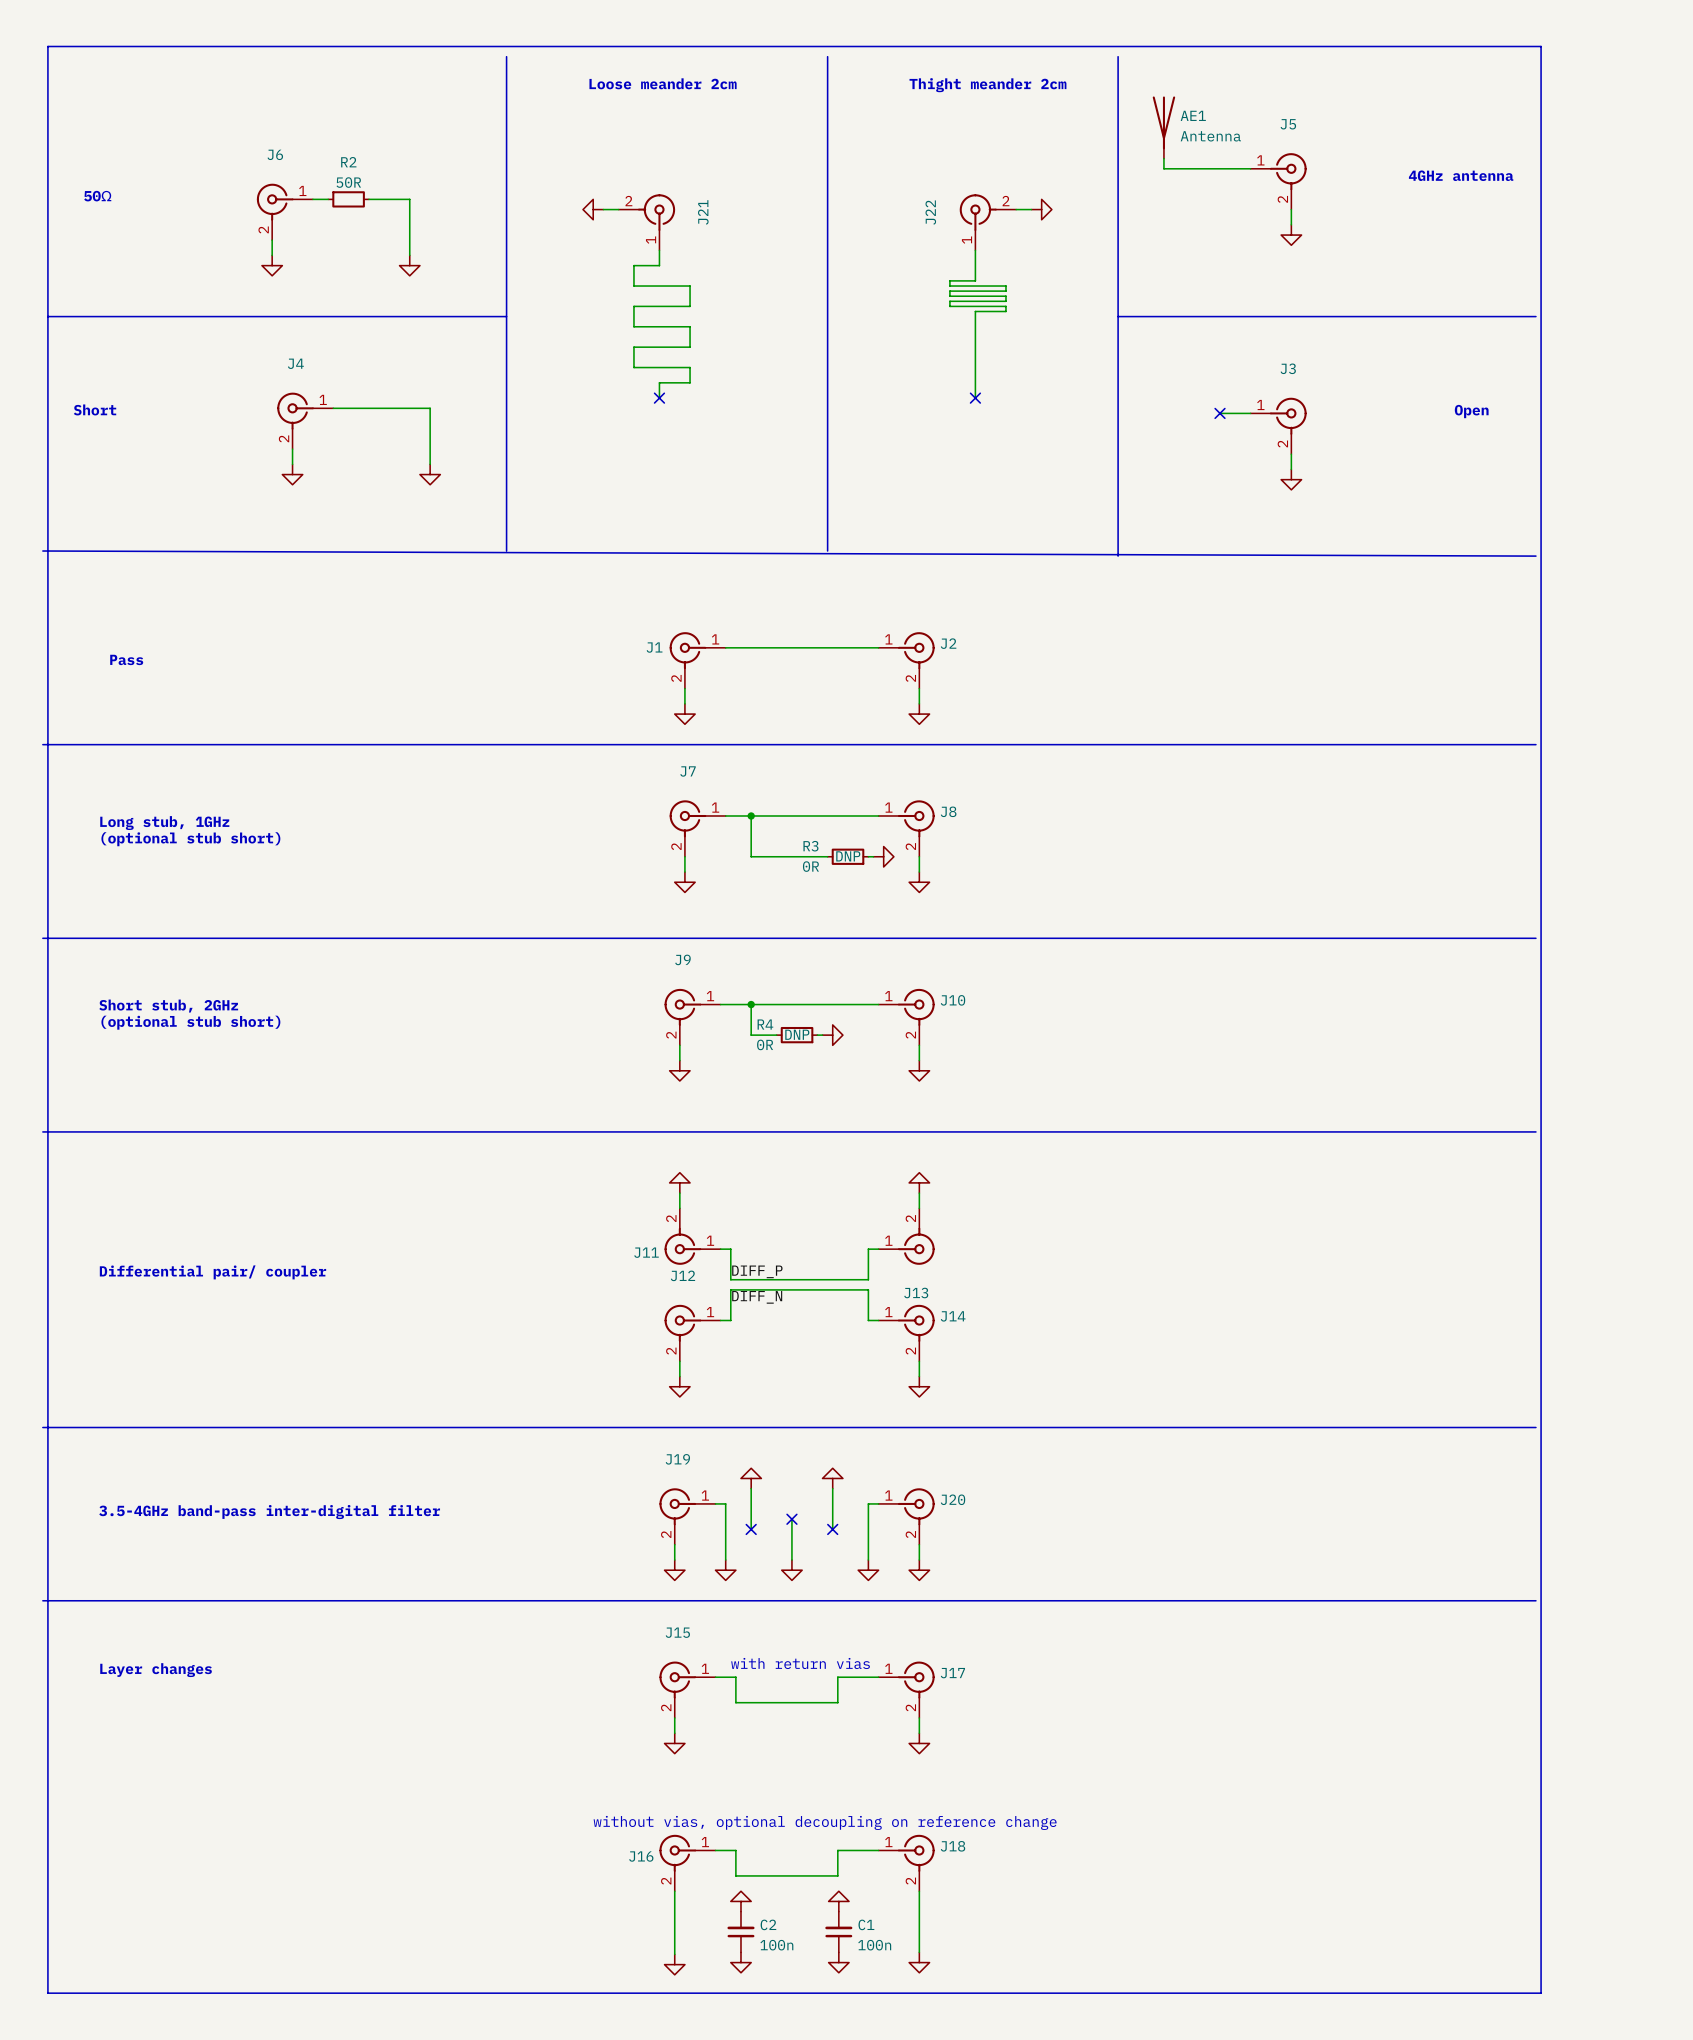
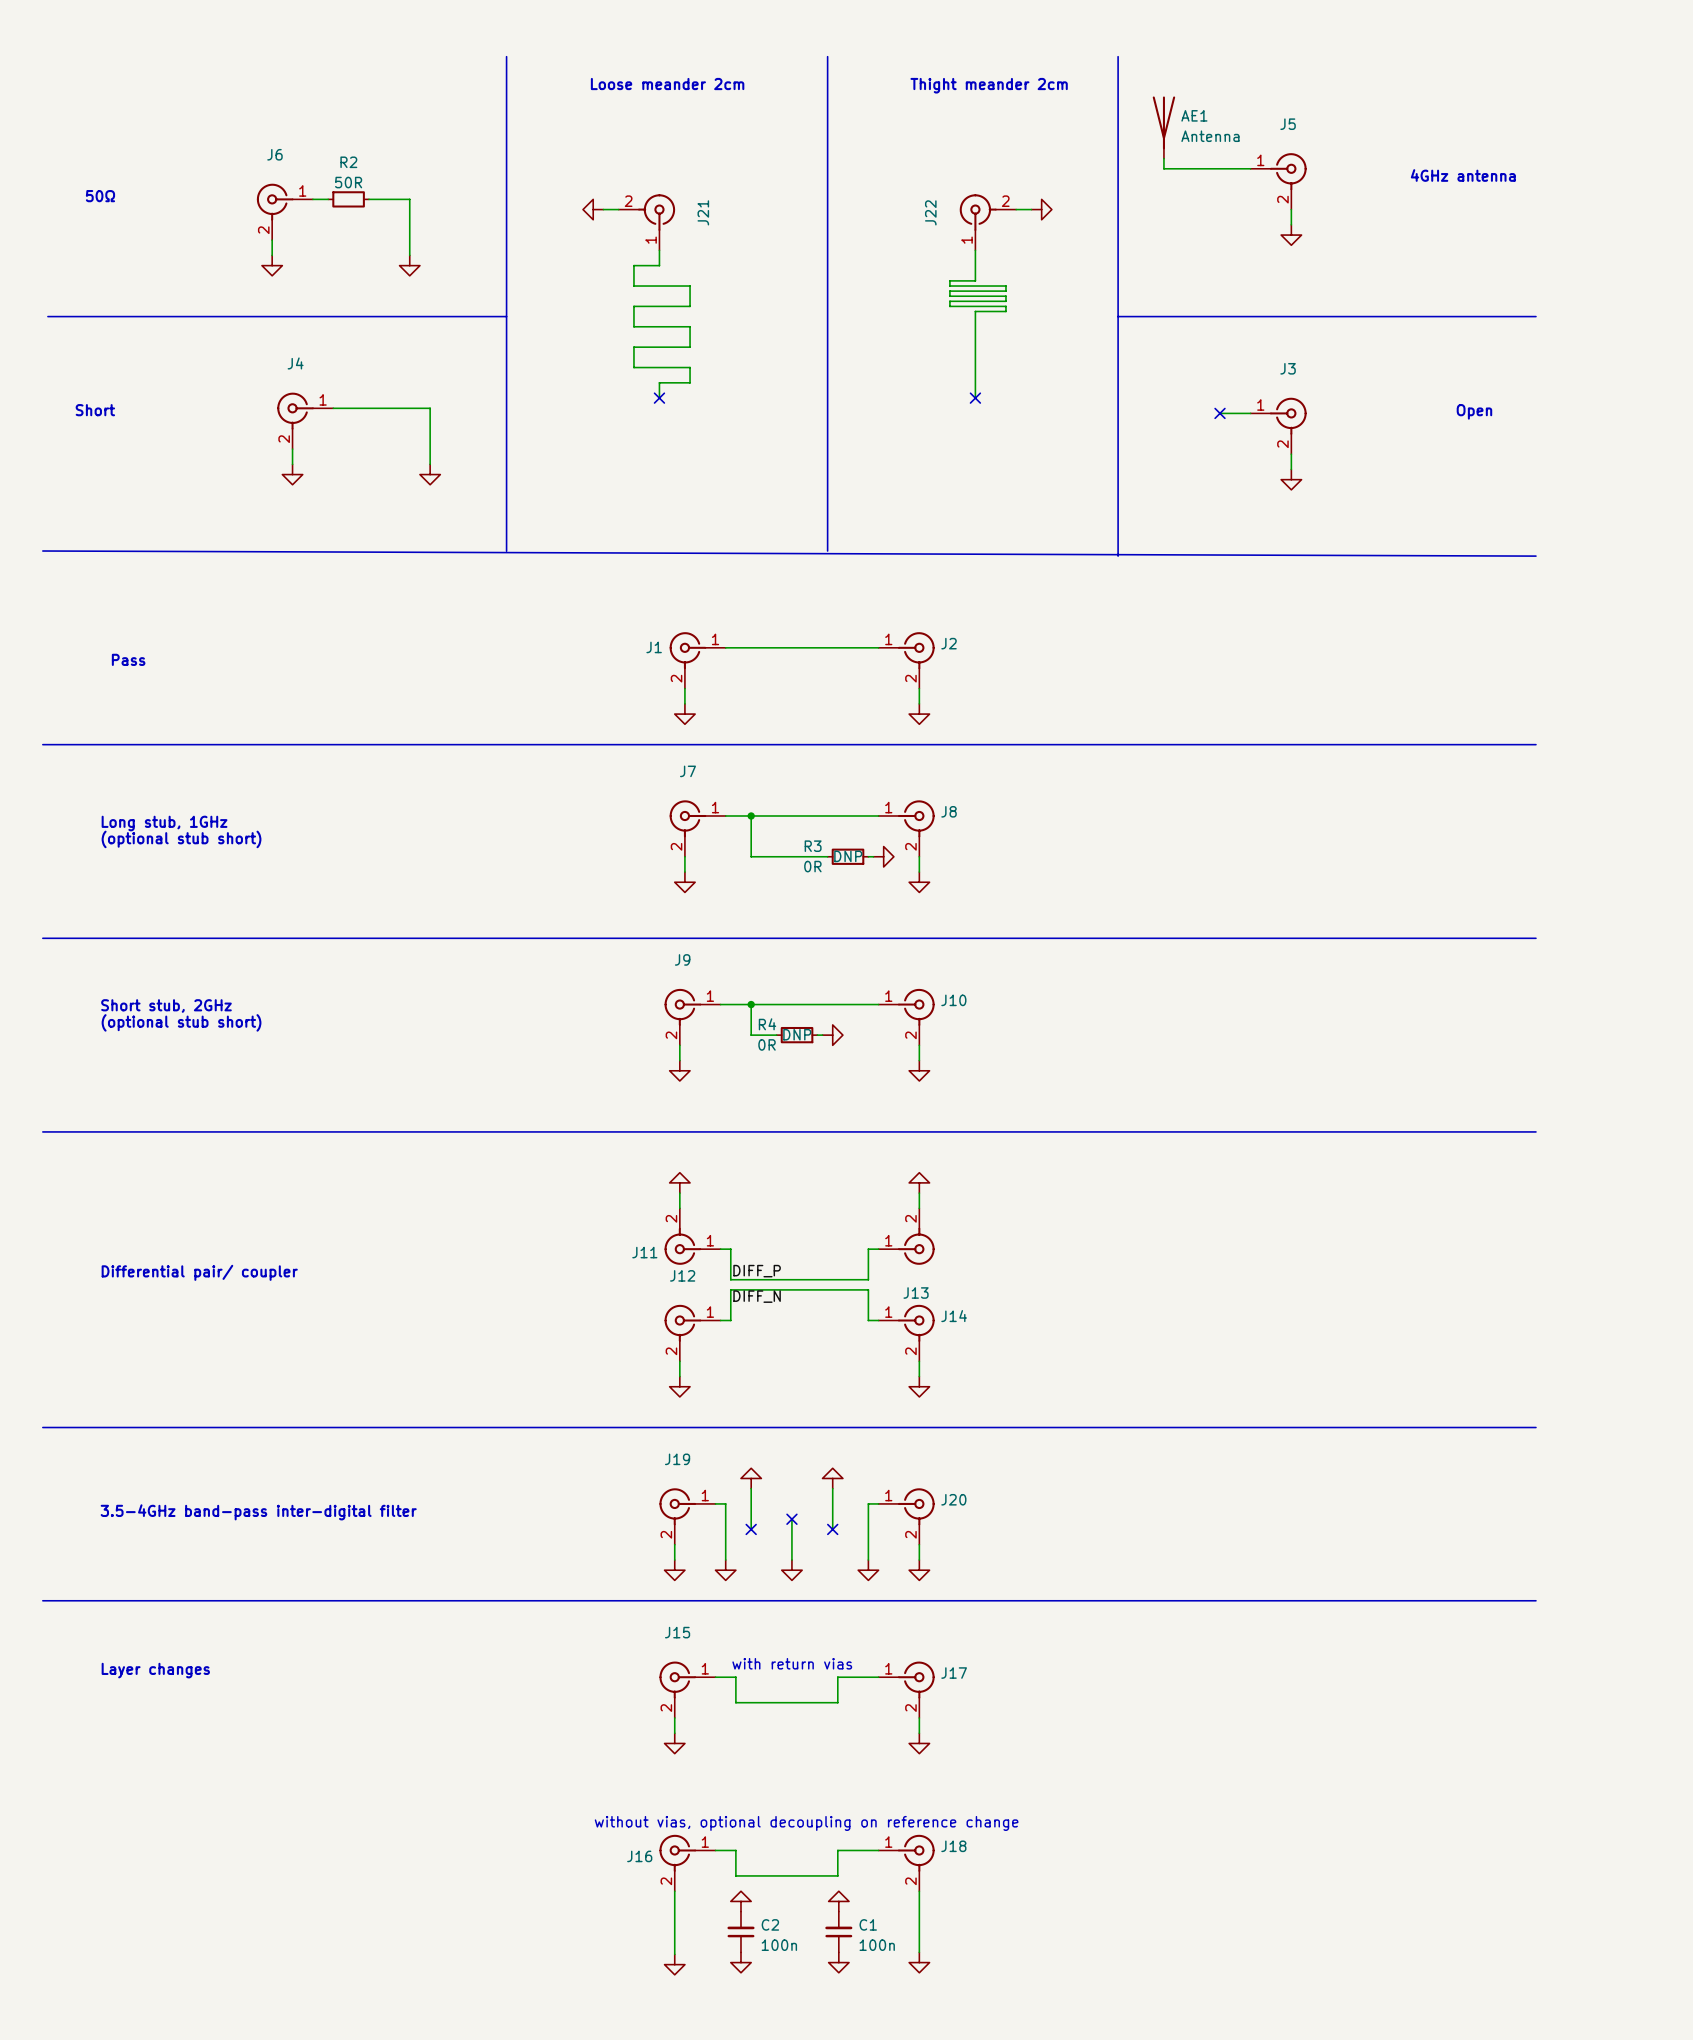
line: (47, 46) (47, 1993) (1541, 1993) (1541, 46) (47, 46) -> none

